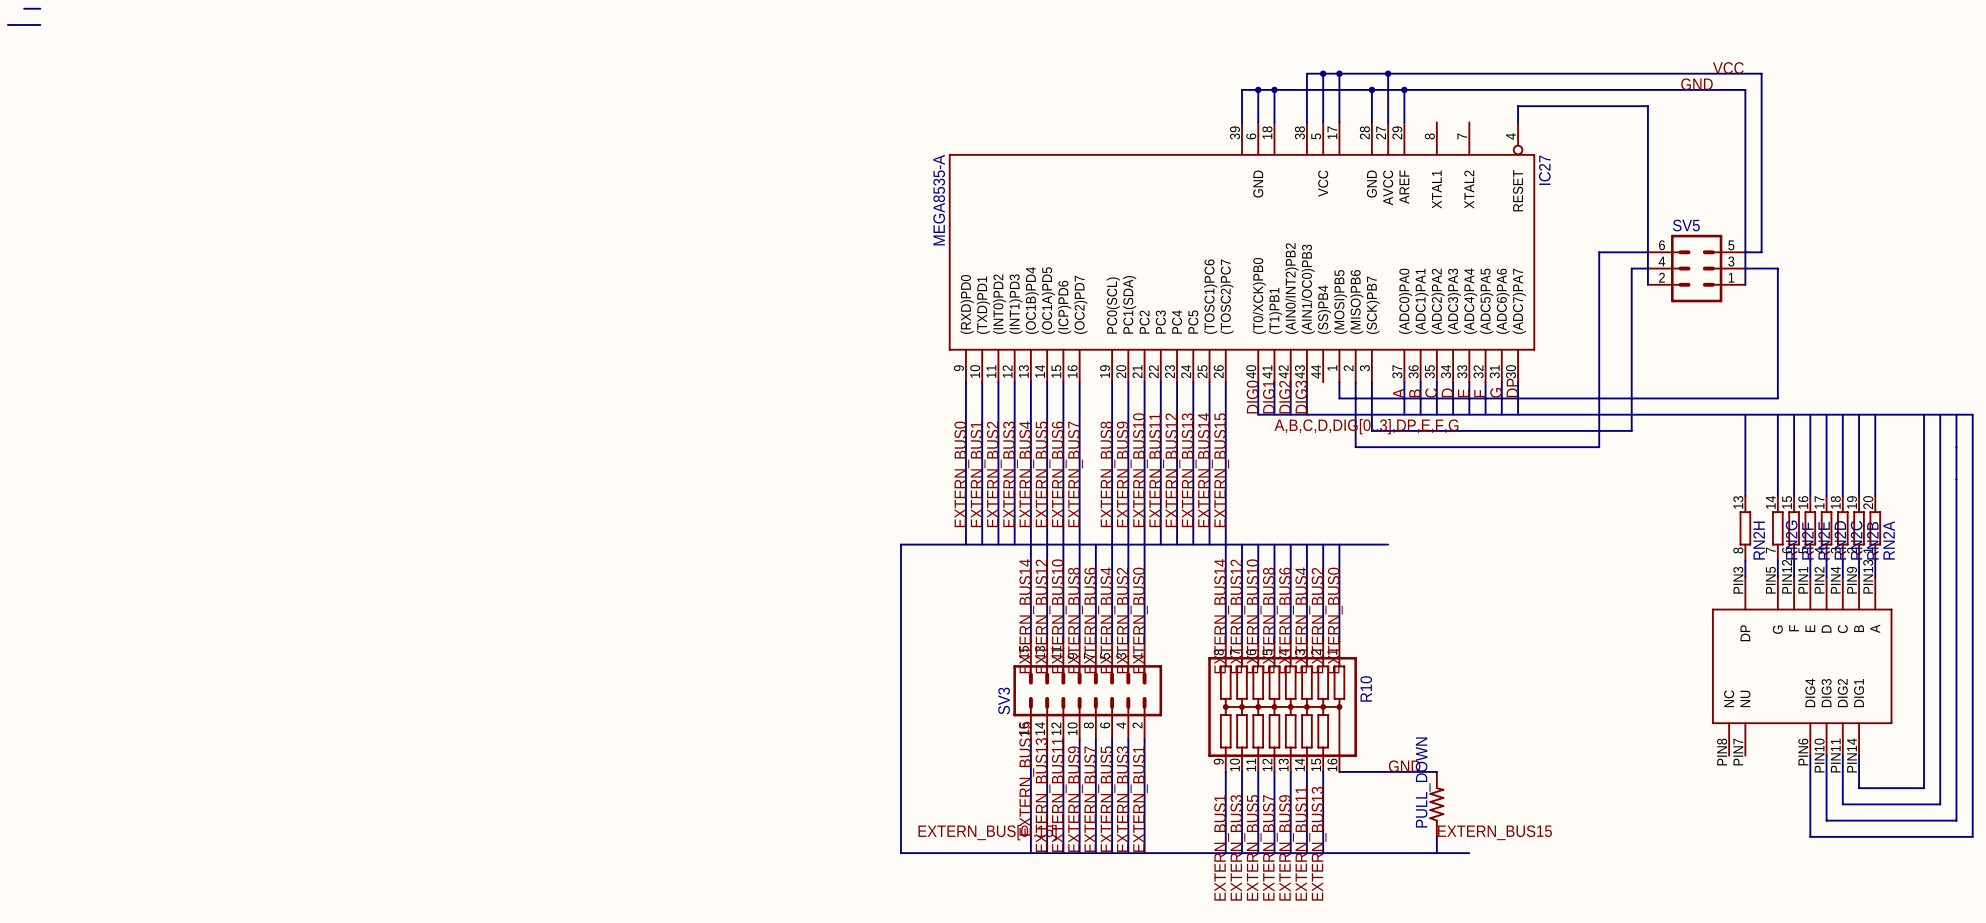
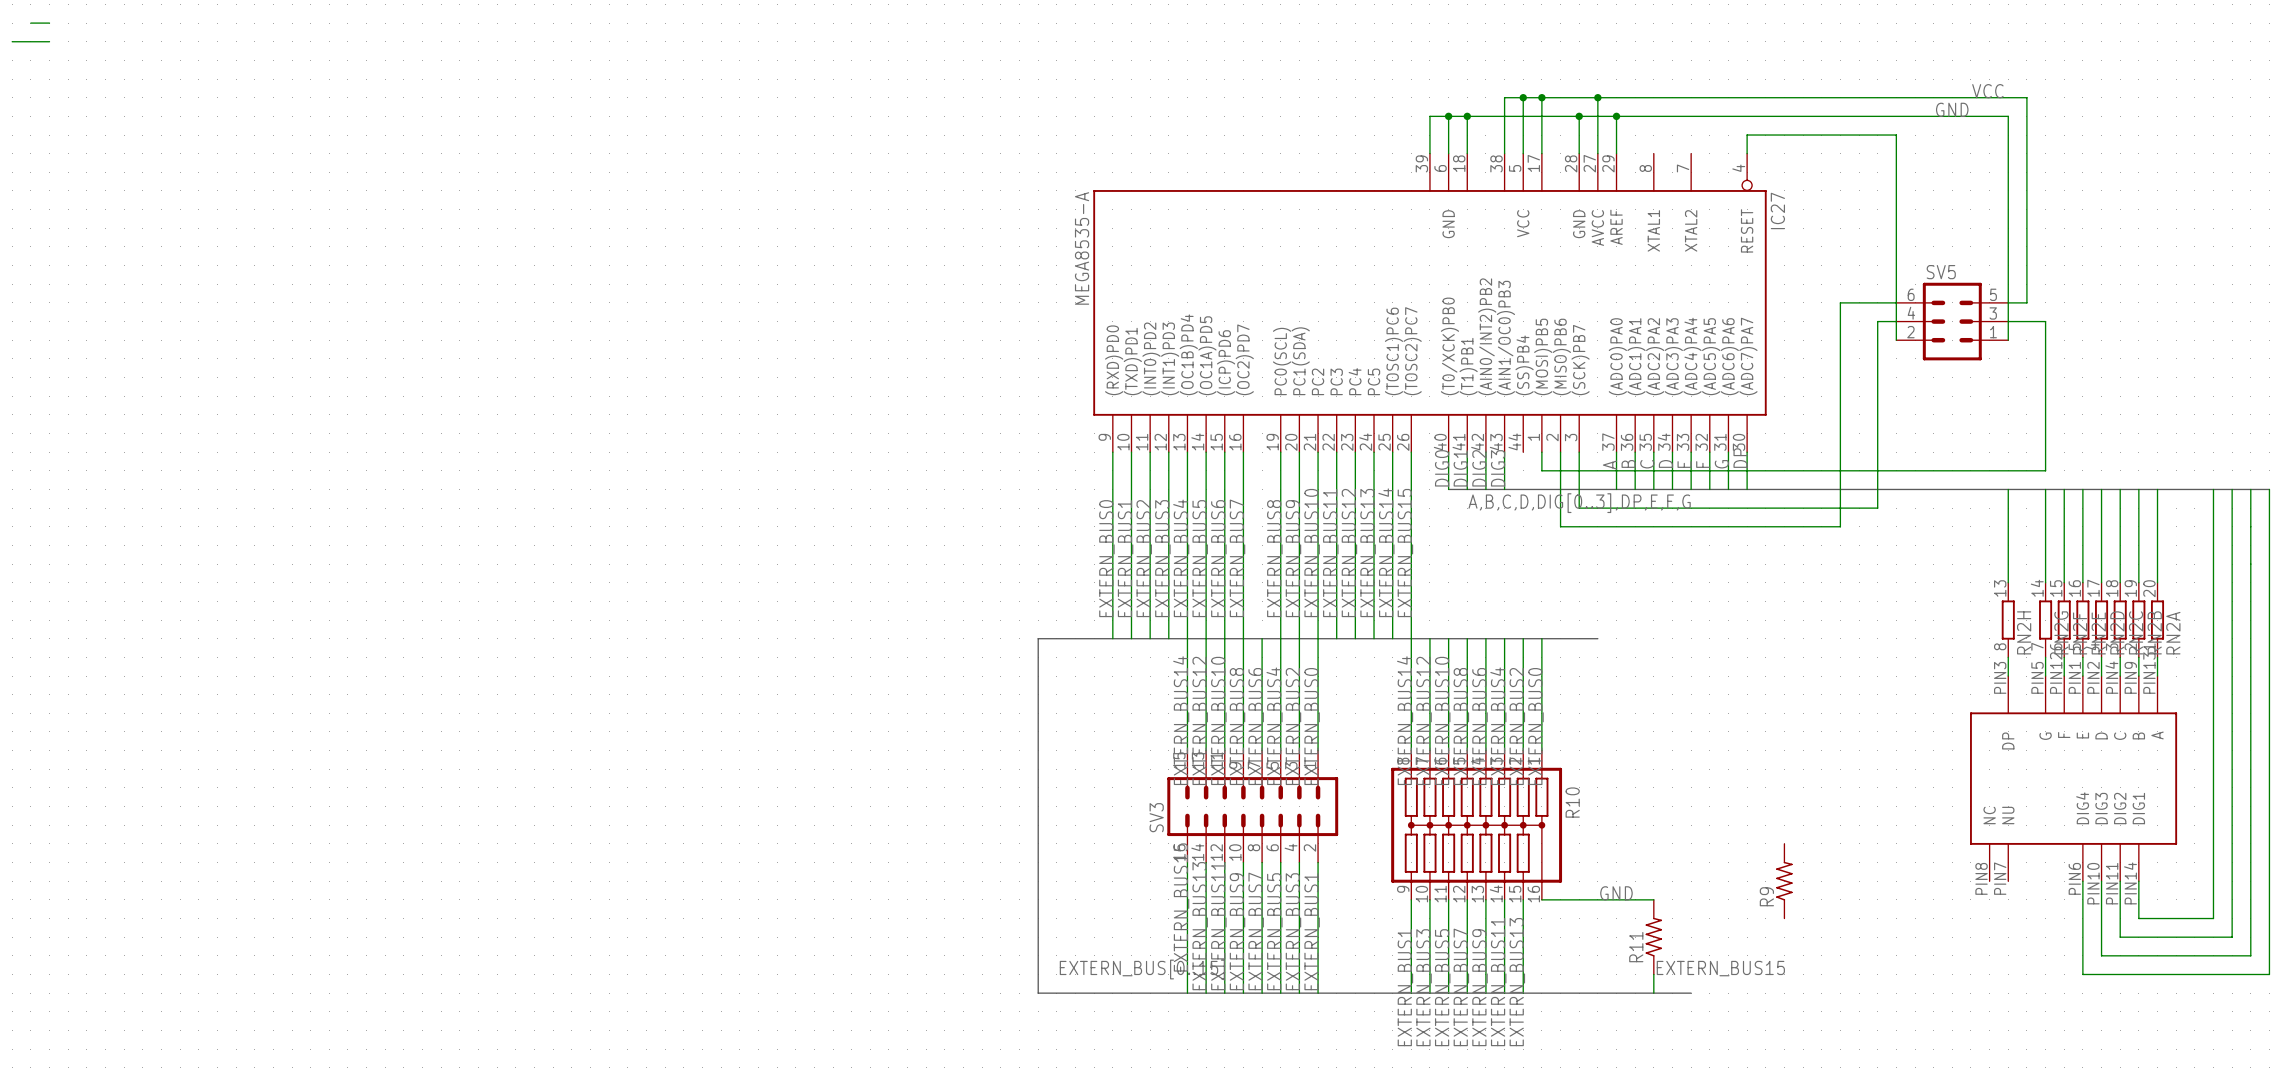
R9: none -> (1784, 881)
PULL_DOWN name: PULL_DOWN (1423, 782) -> R11 (1636, 947)

